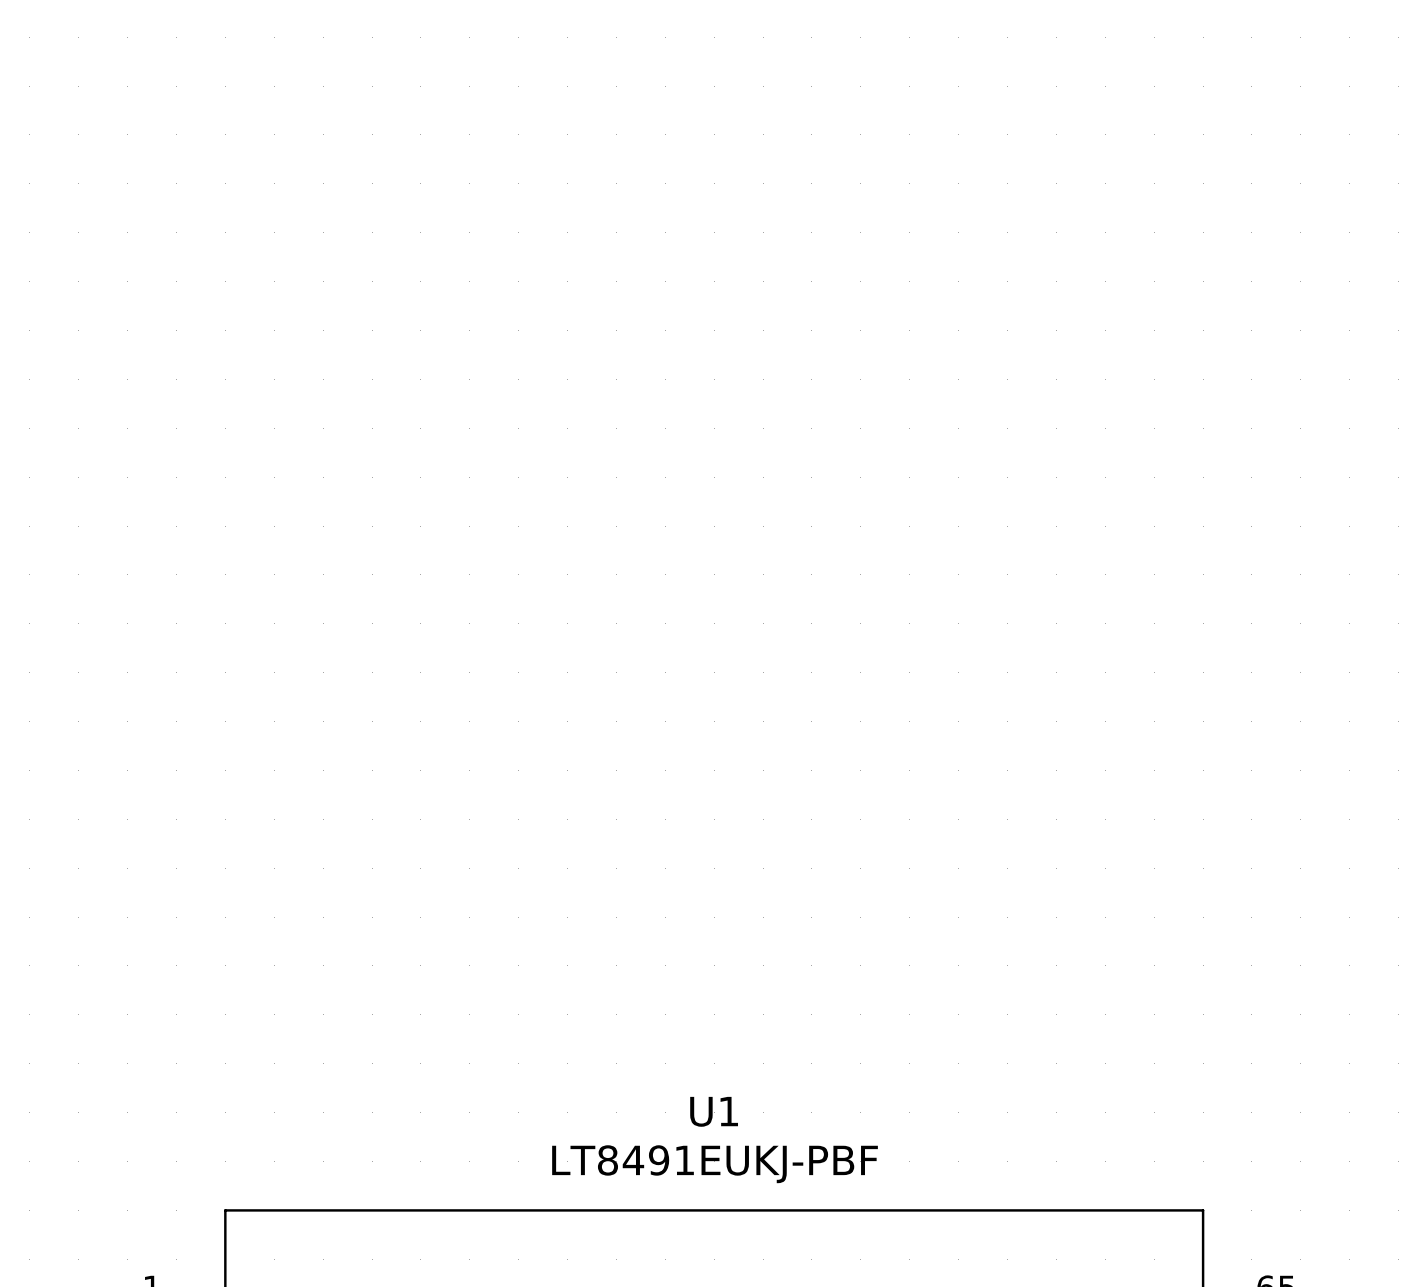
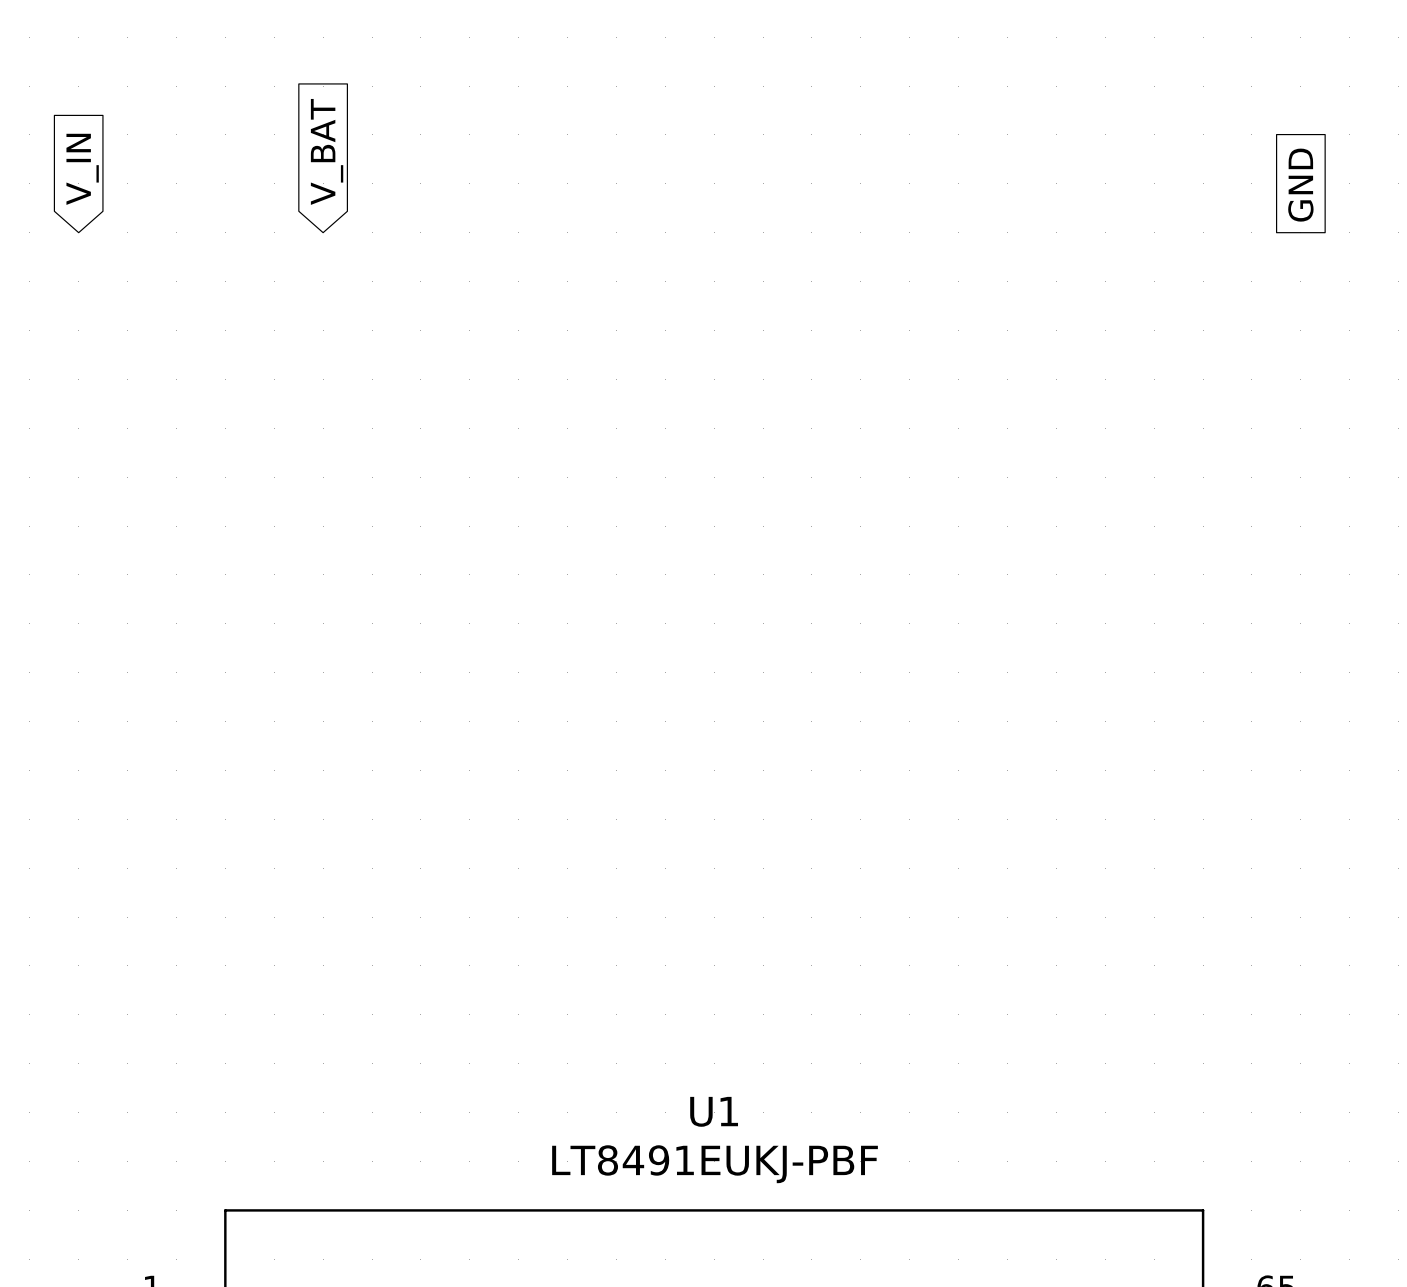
global label: none -> V_BAT (327, 151)
global label: none -> V_IN (82, 169)
global label: none -> GND (1300, 185)

